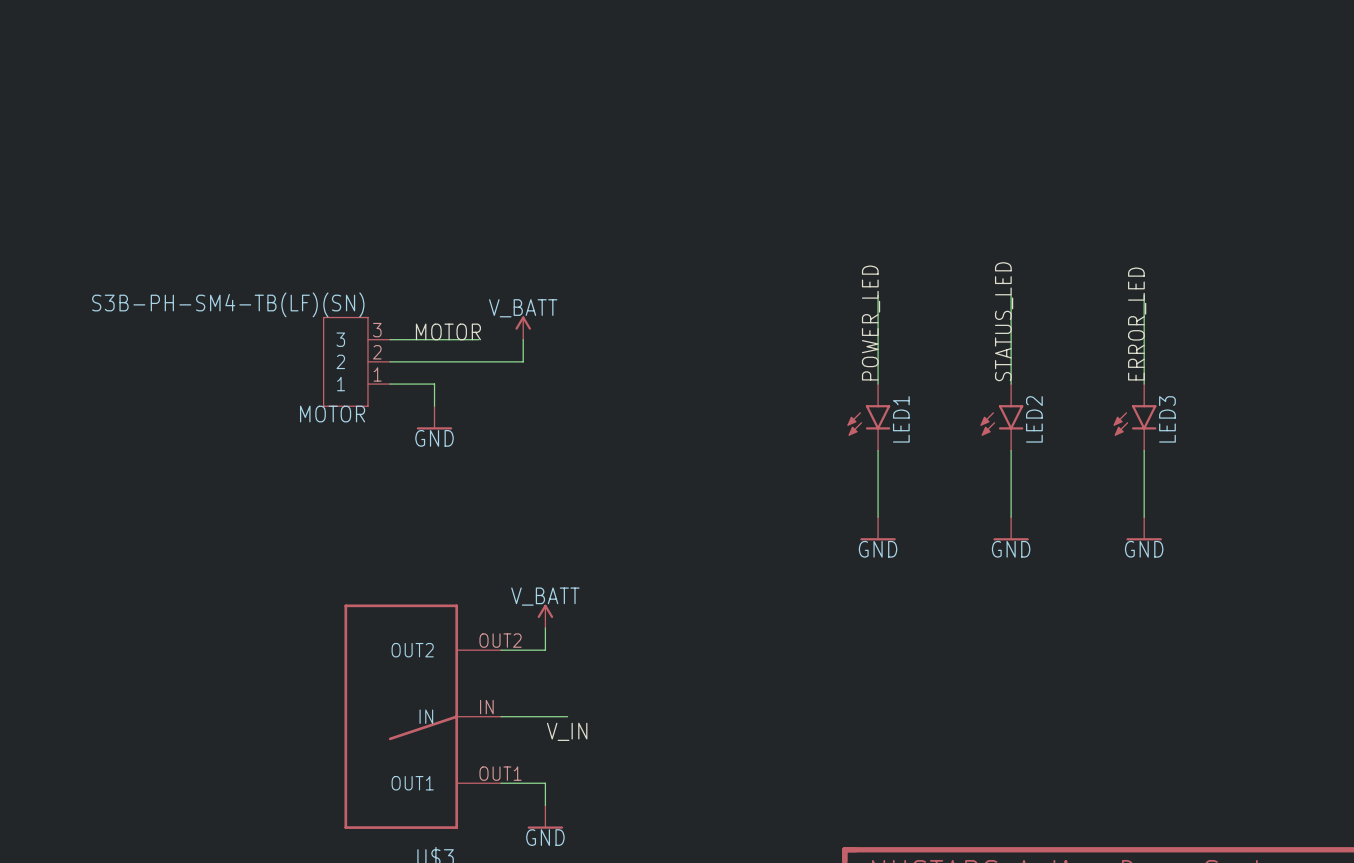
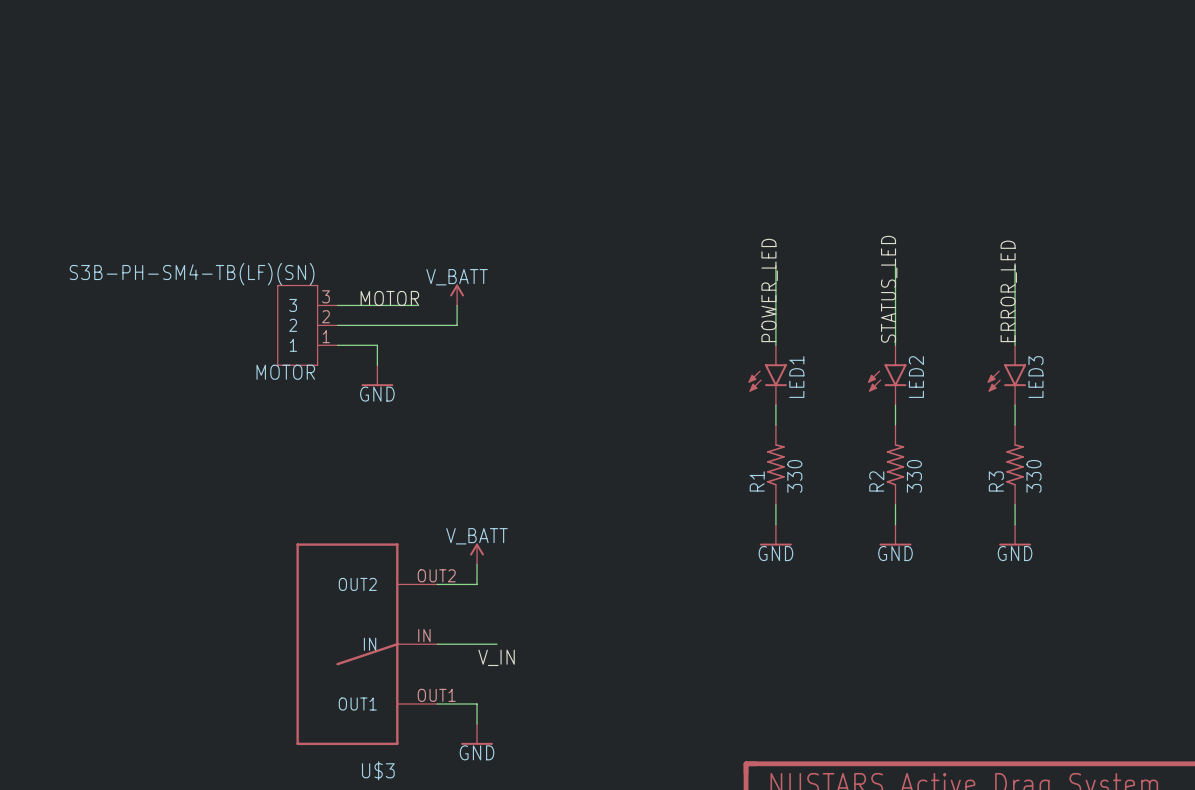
R1: none -> 330 (775, 464)
R2: none -> 330 (895, 464)
R3: none -> 330 (1015, 464)
power symbol position: GND (878, 528) -> GND (775, 535)
power symbol position: GND (1011, 528) -> GND (895, 535)
power symbol position: GND (1144, 528) -> GND (1015, 535)
wire: none -> (775, 504) (775, 524)
wire: none -> (895, 504) (895, 524)
wire: none -> (1015, 504) (1015, 524)

